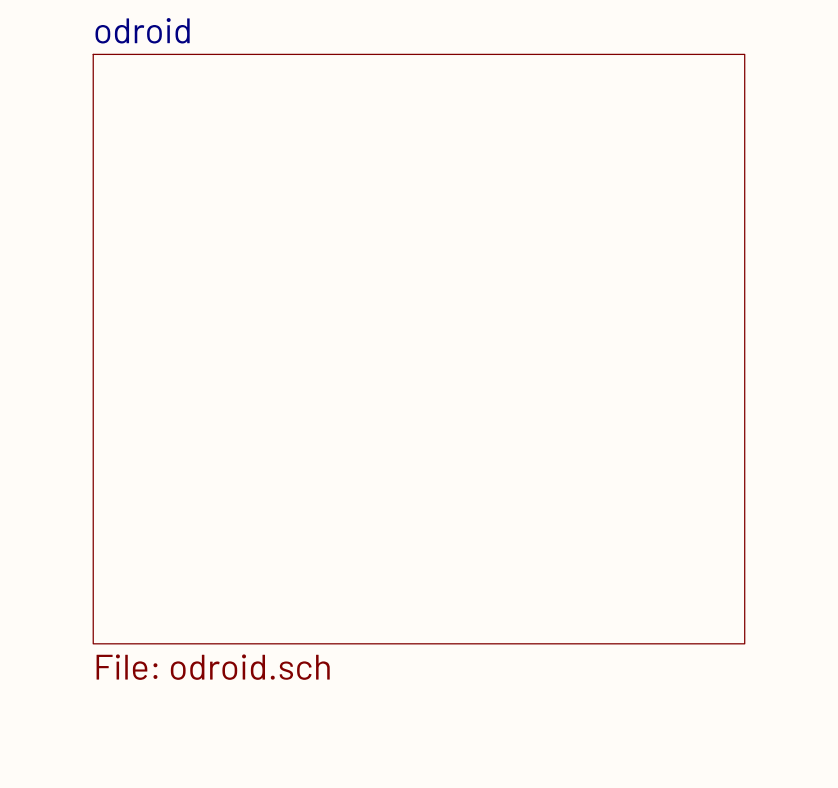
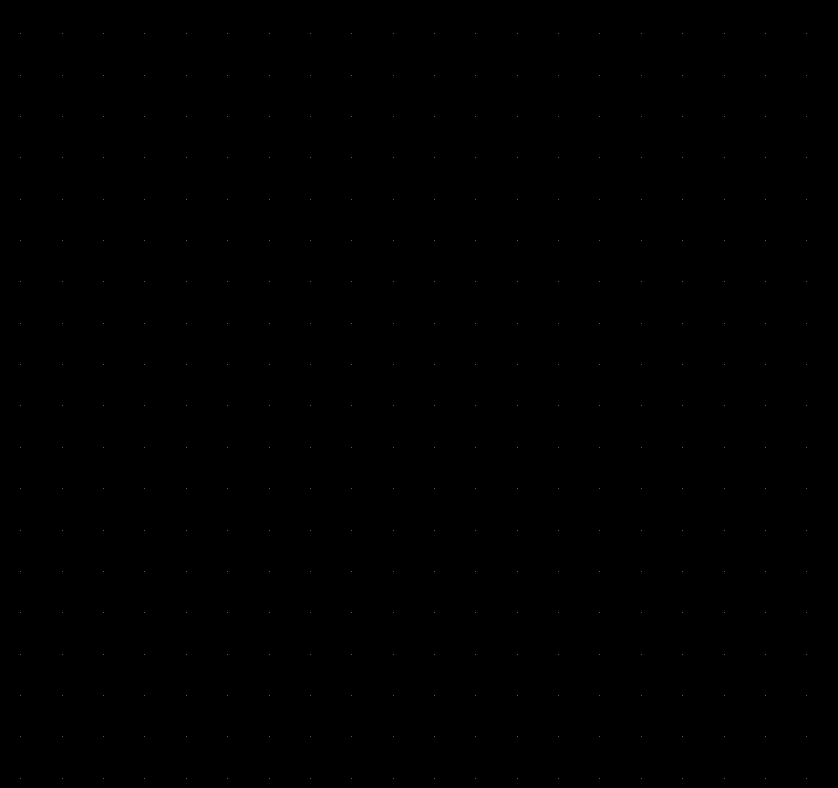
sheet odroid: File: odroid.sch (418, 349) -> none

